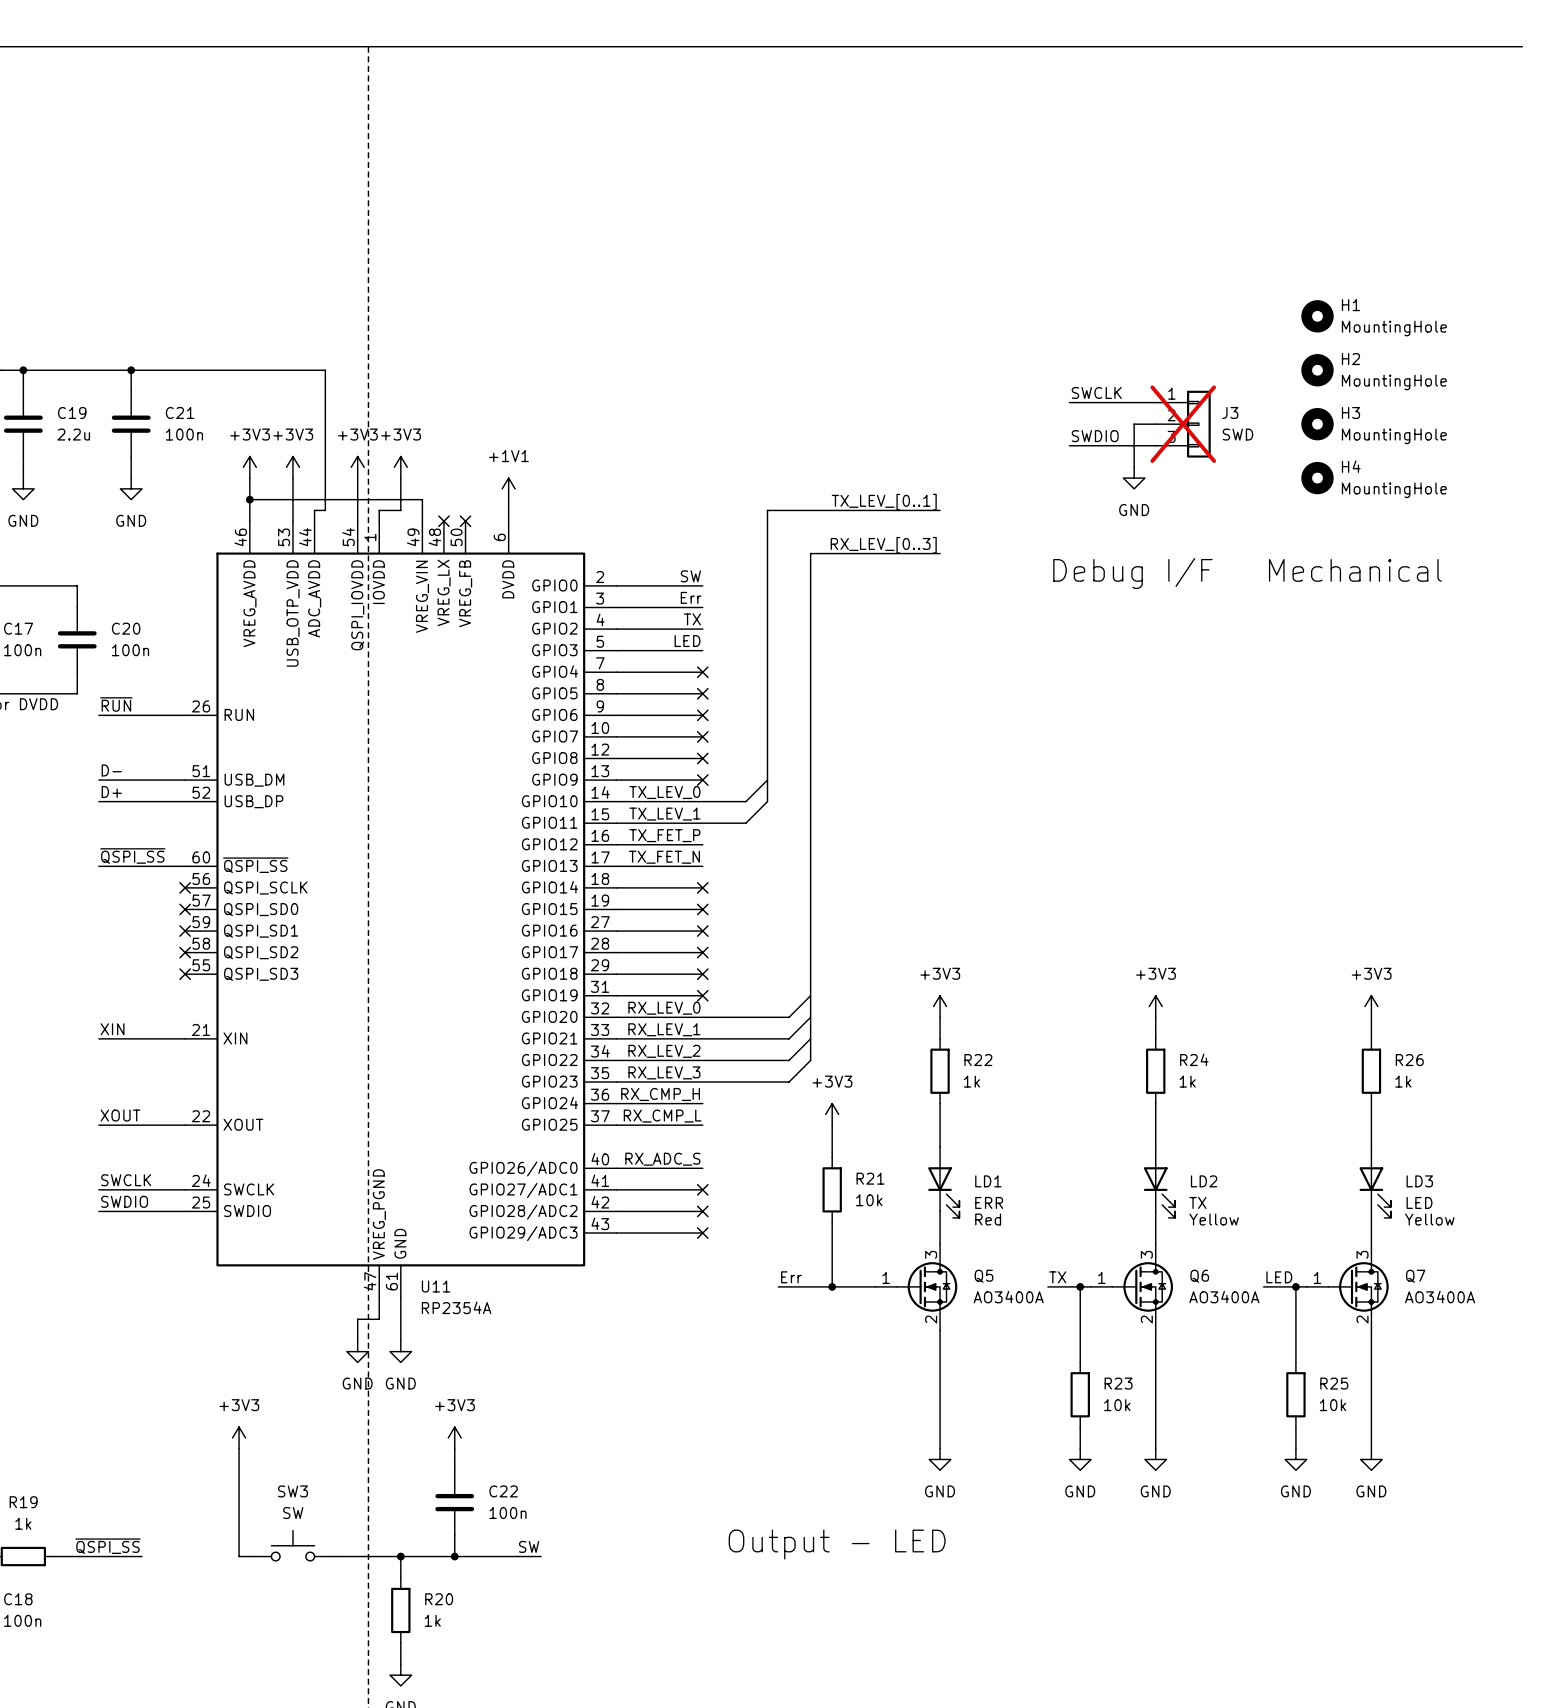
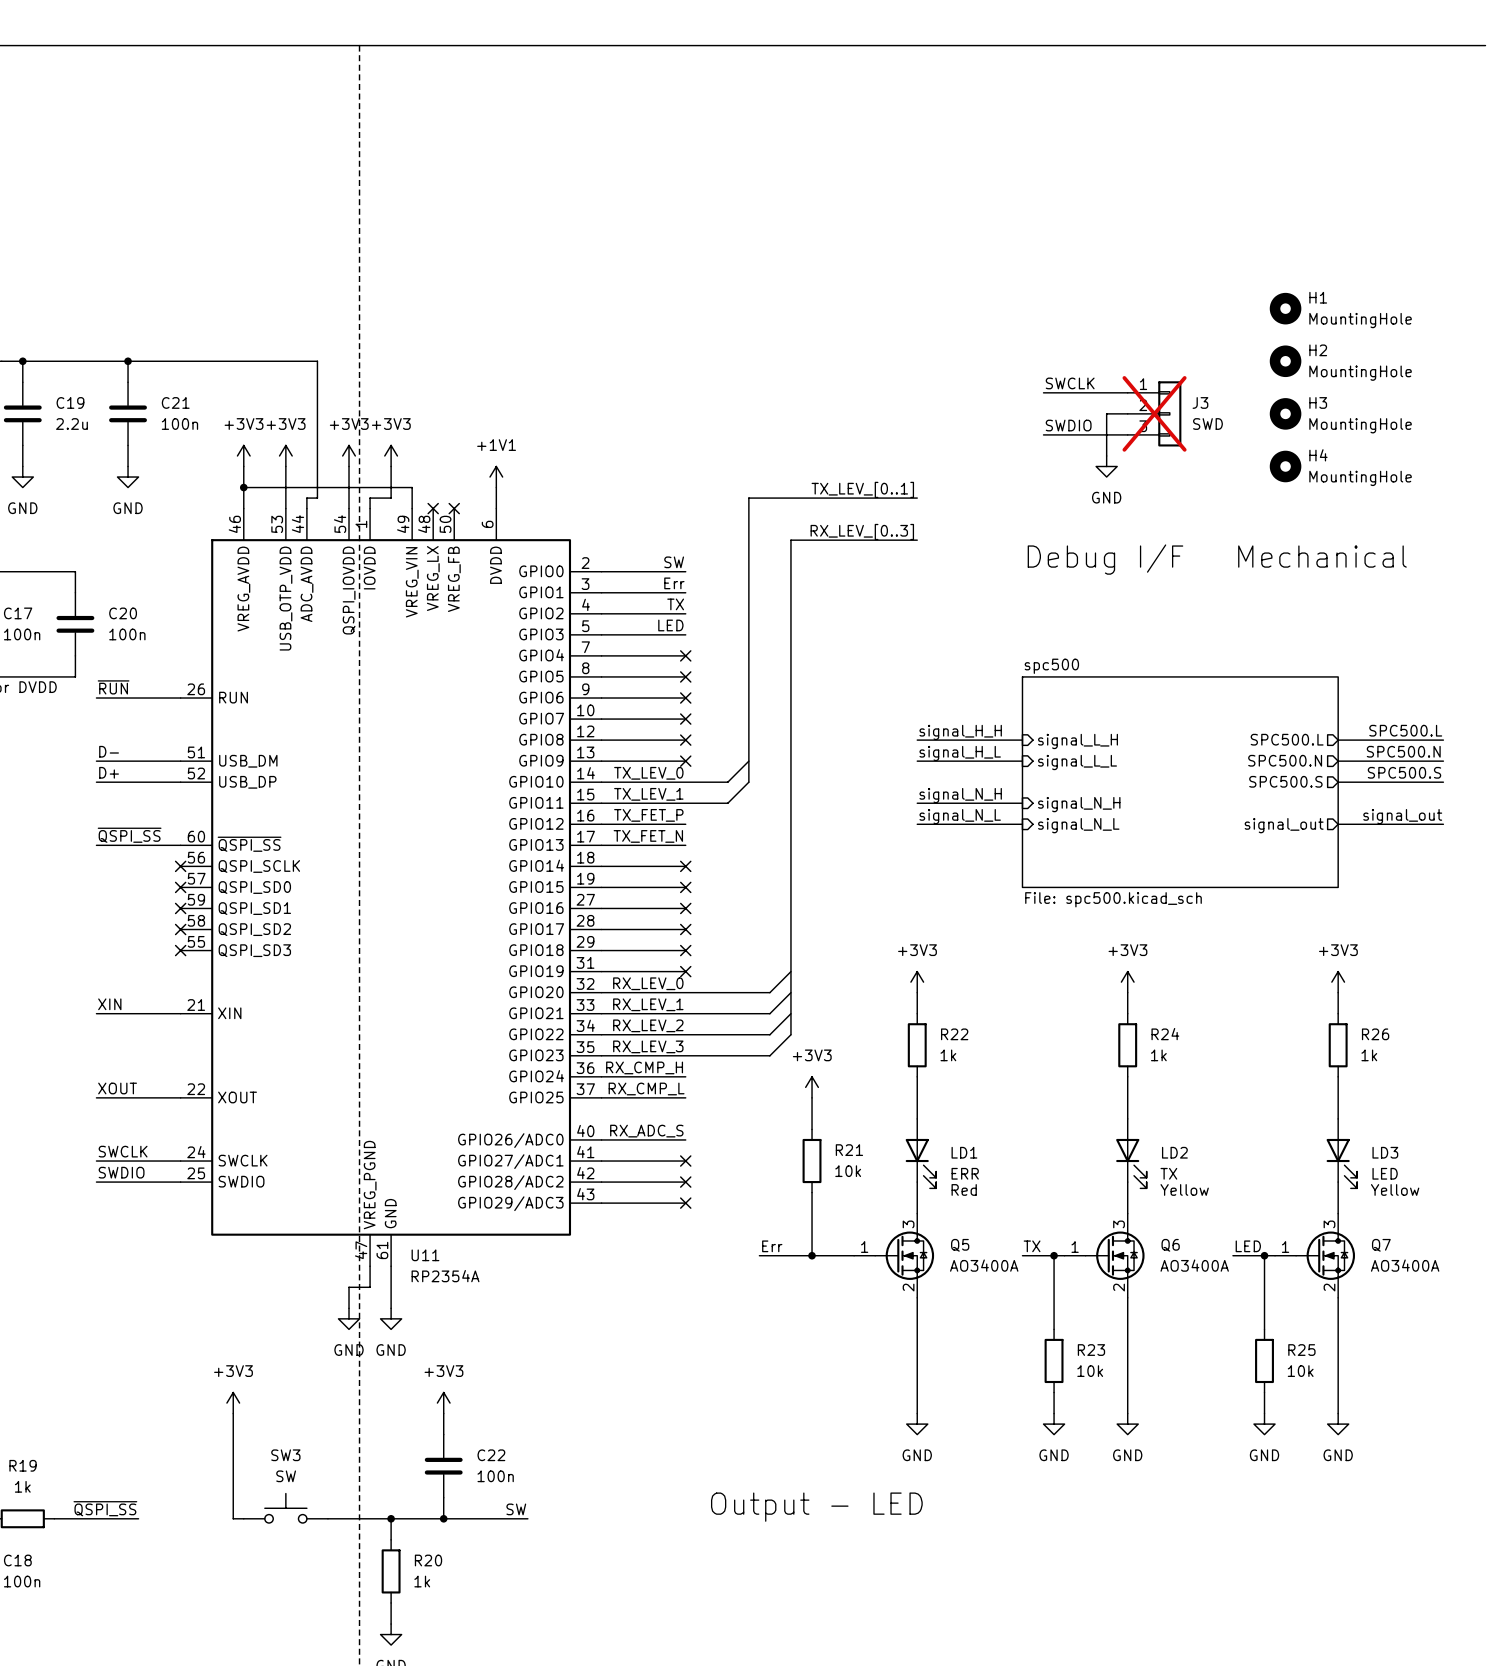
label: none -> SPC500.L (1405, 730)
label: none -> signal_H_H (960, 732)
wire: none -> (917, 740) (1022, 740)
sheet pin: none -> SPC500.L (1287, 739)
wire: none -> (1338, 740) (1443, 740)
sheet pin: none -> signal_L_H (1078, 741)
label: none -> SPC500.N (1403, 751)
label: none -> signal_H_L (960, 753)
sheet pin: none -> SPC500.N (1285, 760)
wire: none -> (917, 761) (1022, 761)
wire: none -> (1338, 761) (1443, 761)
sheet pin: none -> signal_L_L (1077, 762)
label: none -> SPC500.S (1404, 772)
sheet spc500: none -> File: spc500.kicad_sch (1180, 782)
sheet pin: none -> SPC500.S (1285, 781)
wire: none -> (1338, 782) (1443, 782)
label: none -> signal_N_H (960, 795)
wire: none -> (917, 803) (1022, 803)
sheet pin: none -> signal_N_H (1079, 804)
label: none -> signal_N_L (960, 816)
label: none -> signal_out (1402, 816)
wire: none -> (917, 824) (1022, 824)
wire: none -> (1338, 824) (1443, 824)
sheet pin: none -> signal_N_L (1078, 825)
sheet pin: none -> signal_out (1284, 825)

